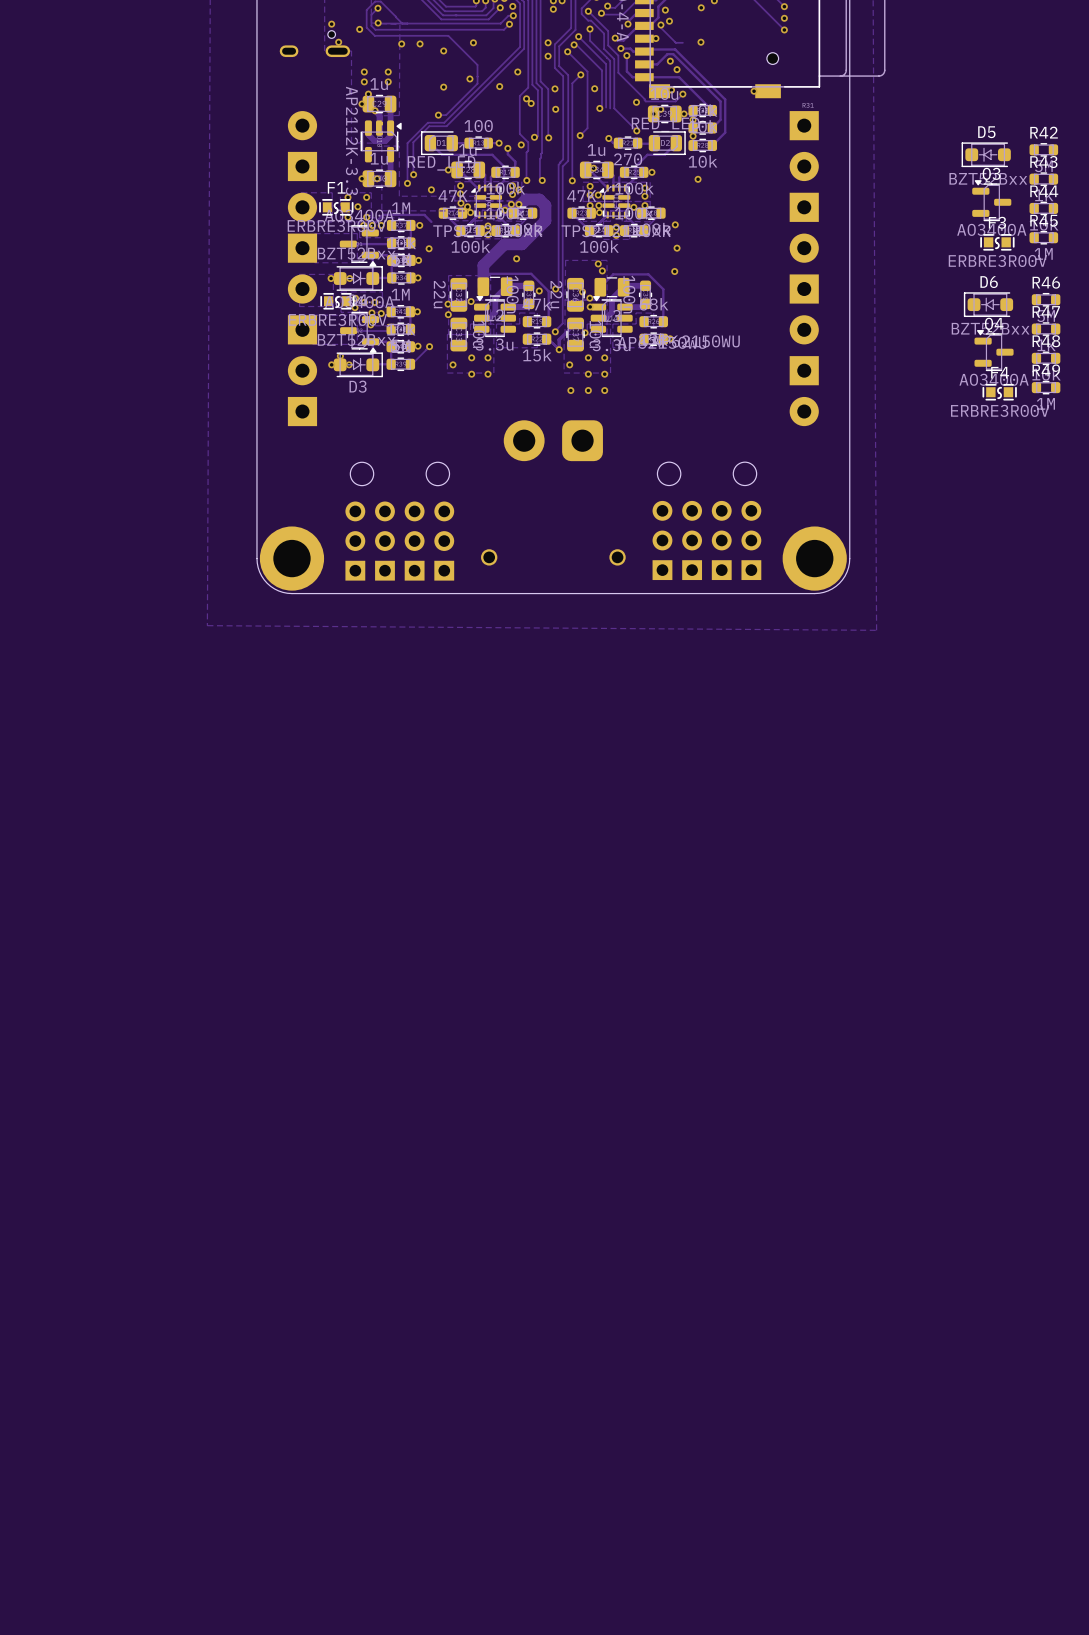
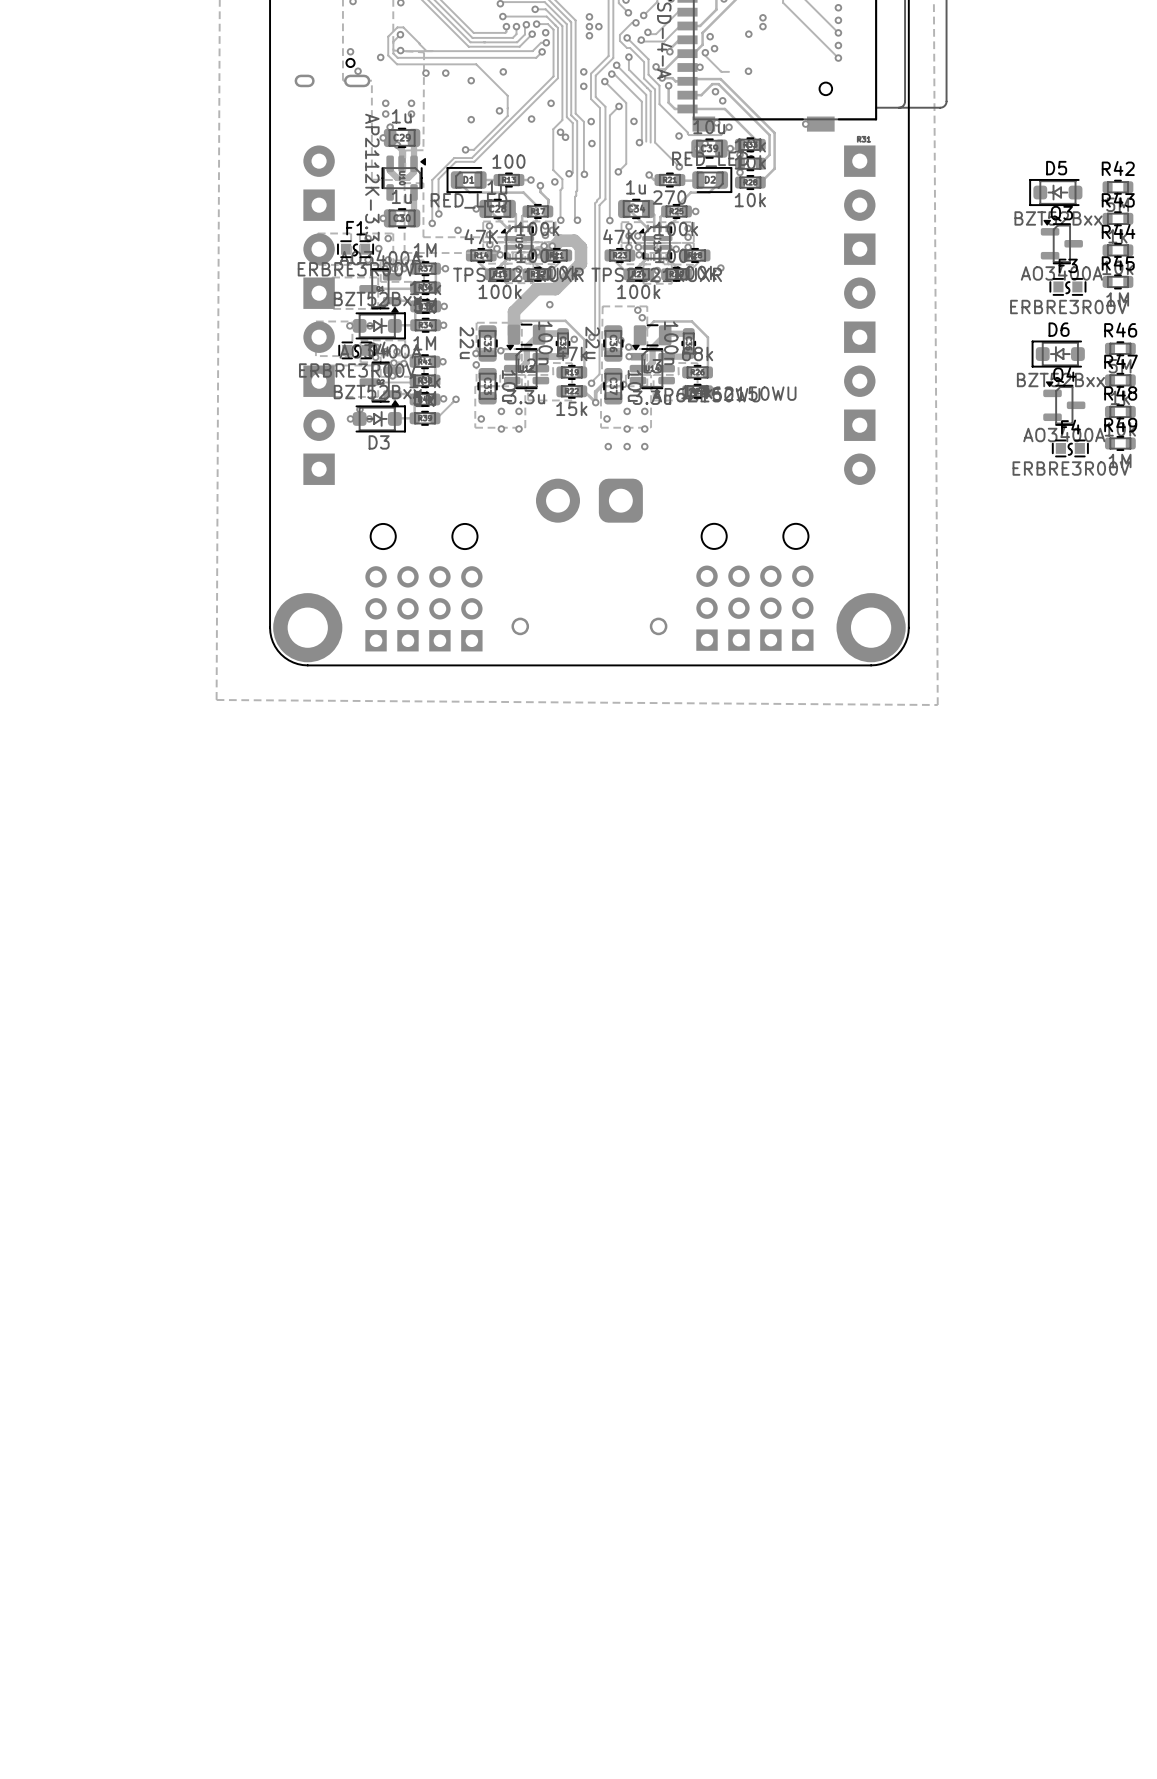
via: (698, 179) -> none
track: (383, 214) (424, 214) (431, 221) -> none
via: (429, 248) -> none
via: (677, 248) -> none
via: (674, 271) -> none

